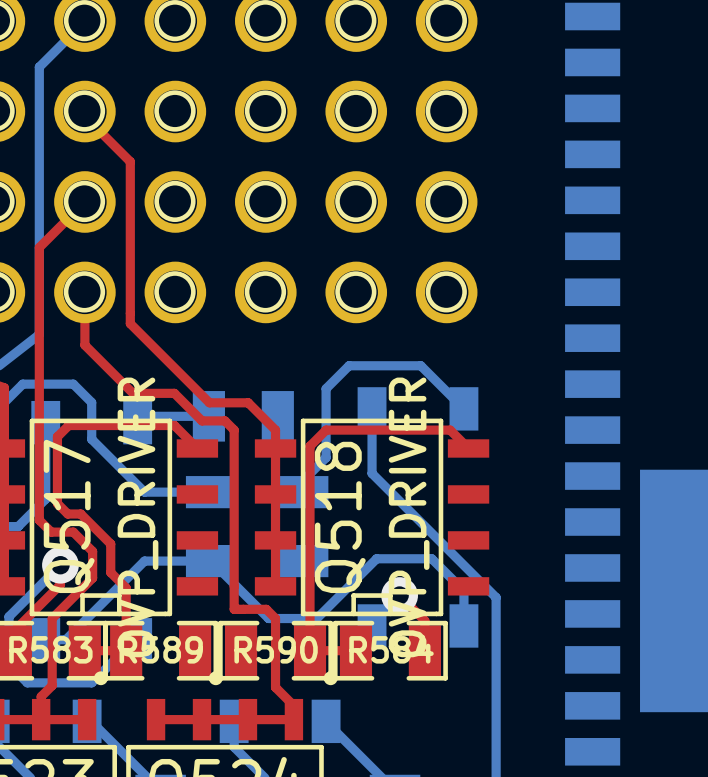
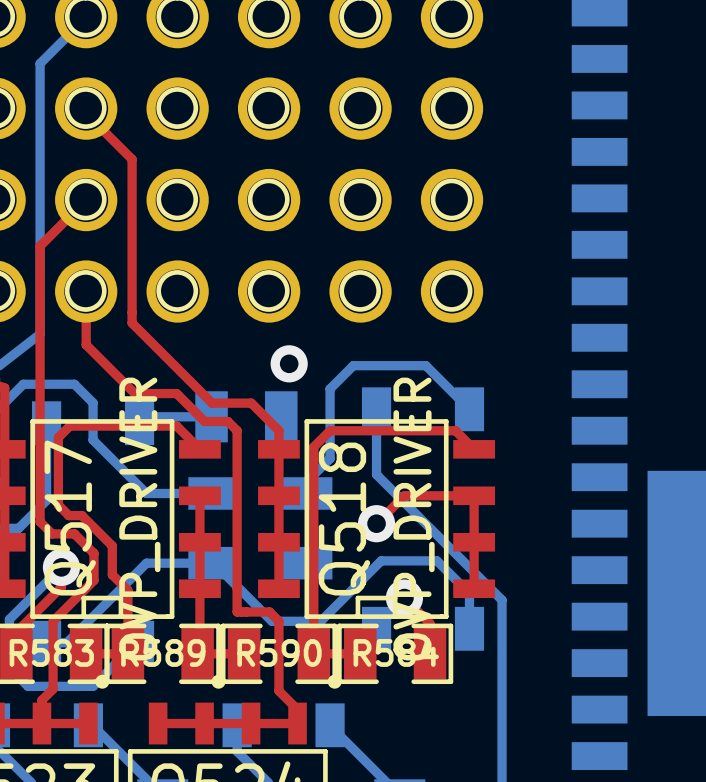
via: none -> (289, 363)
top track: none -> (199, 495) (199, 651) (197, 653) (244, 653)
top track: none -> (376, 523) (404, 495) (474, 495) (474, 588)
via: none -> (376, 523)

